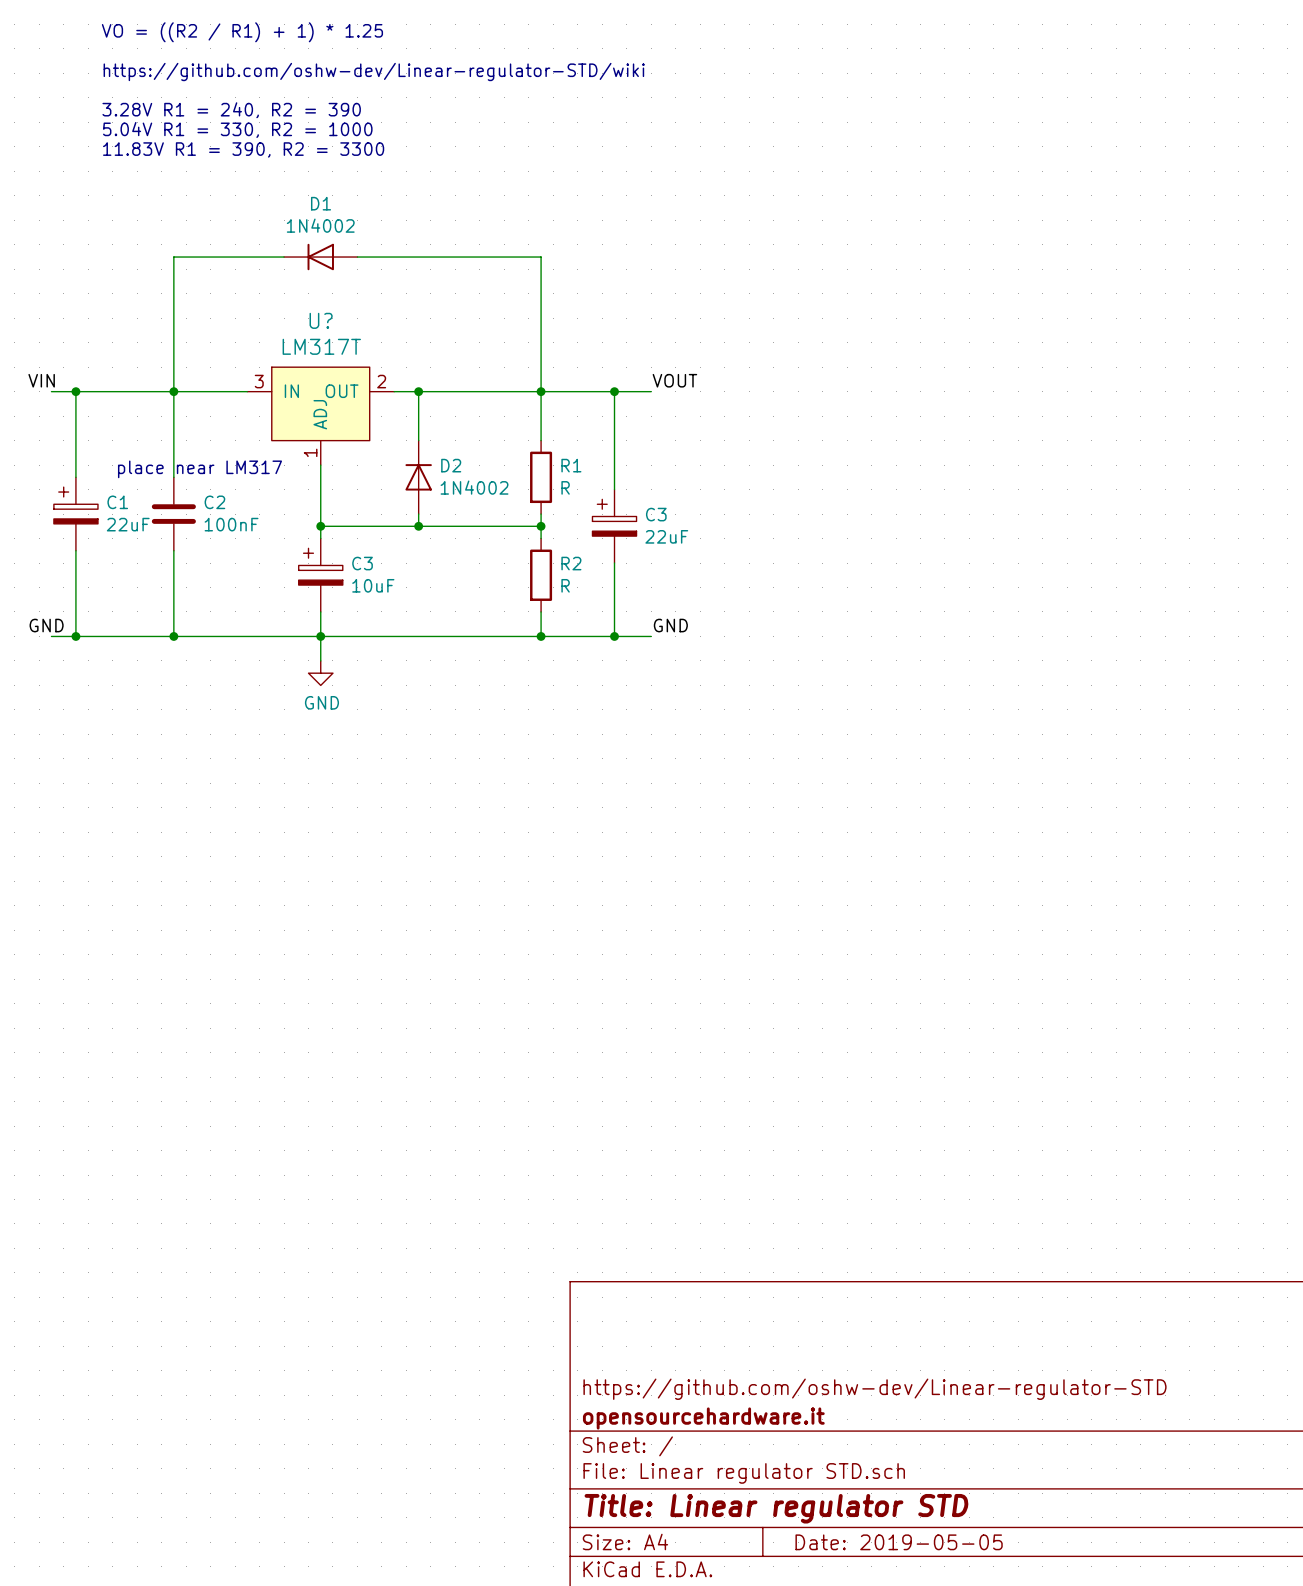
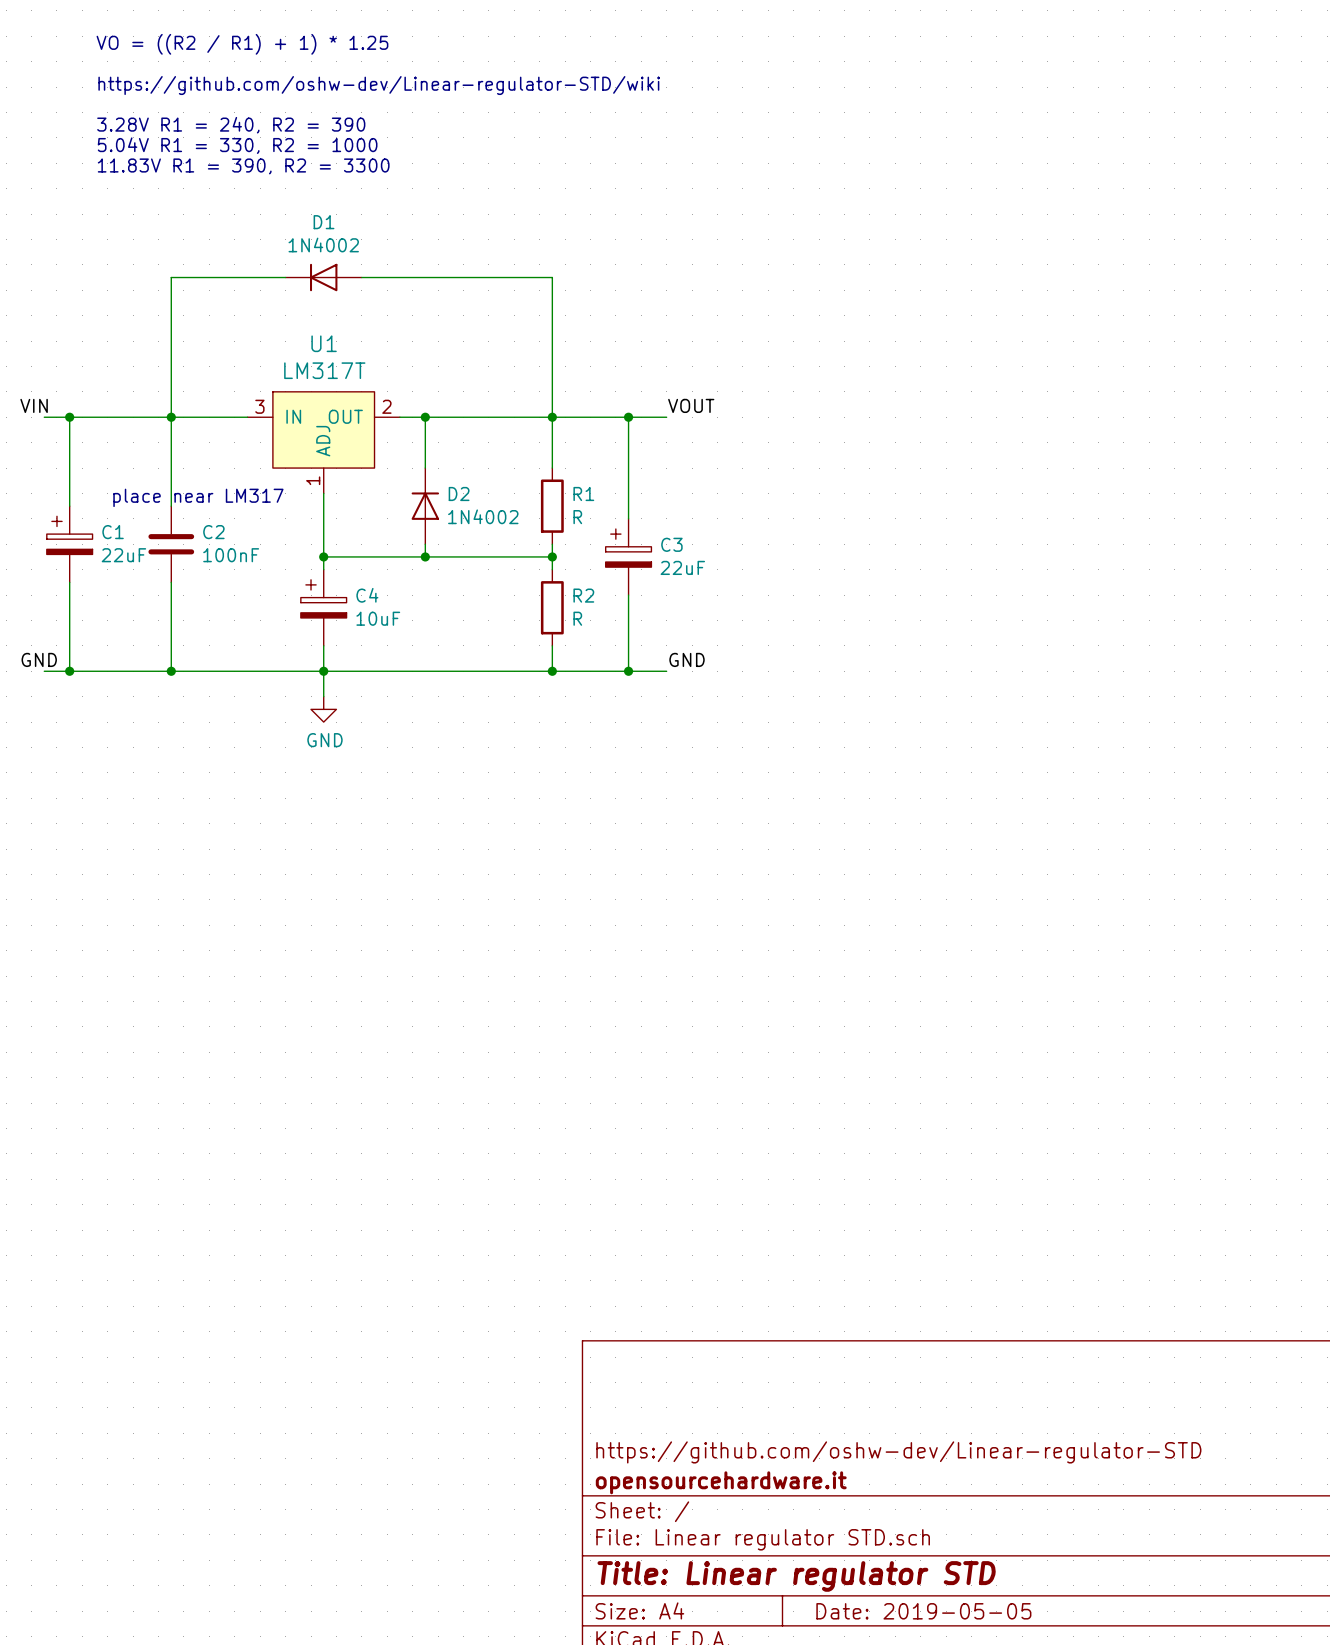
U? name: U? (321, 320) -> U1 (324, 343)
C3 name: C3 (362, 563) -> C4 (367, 595)

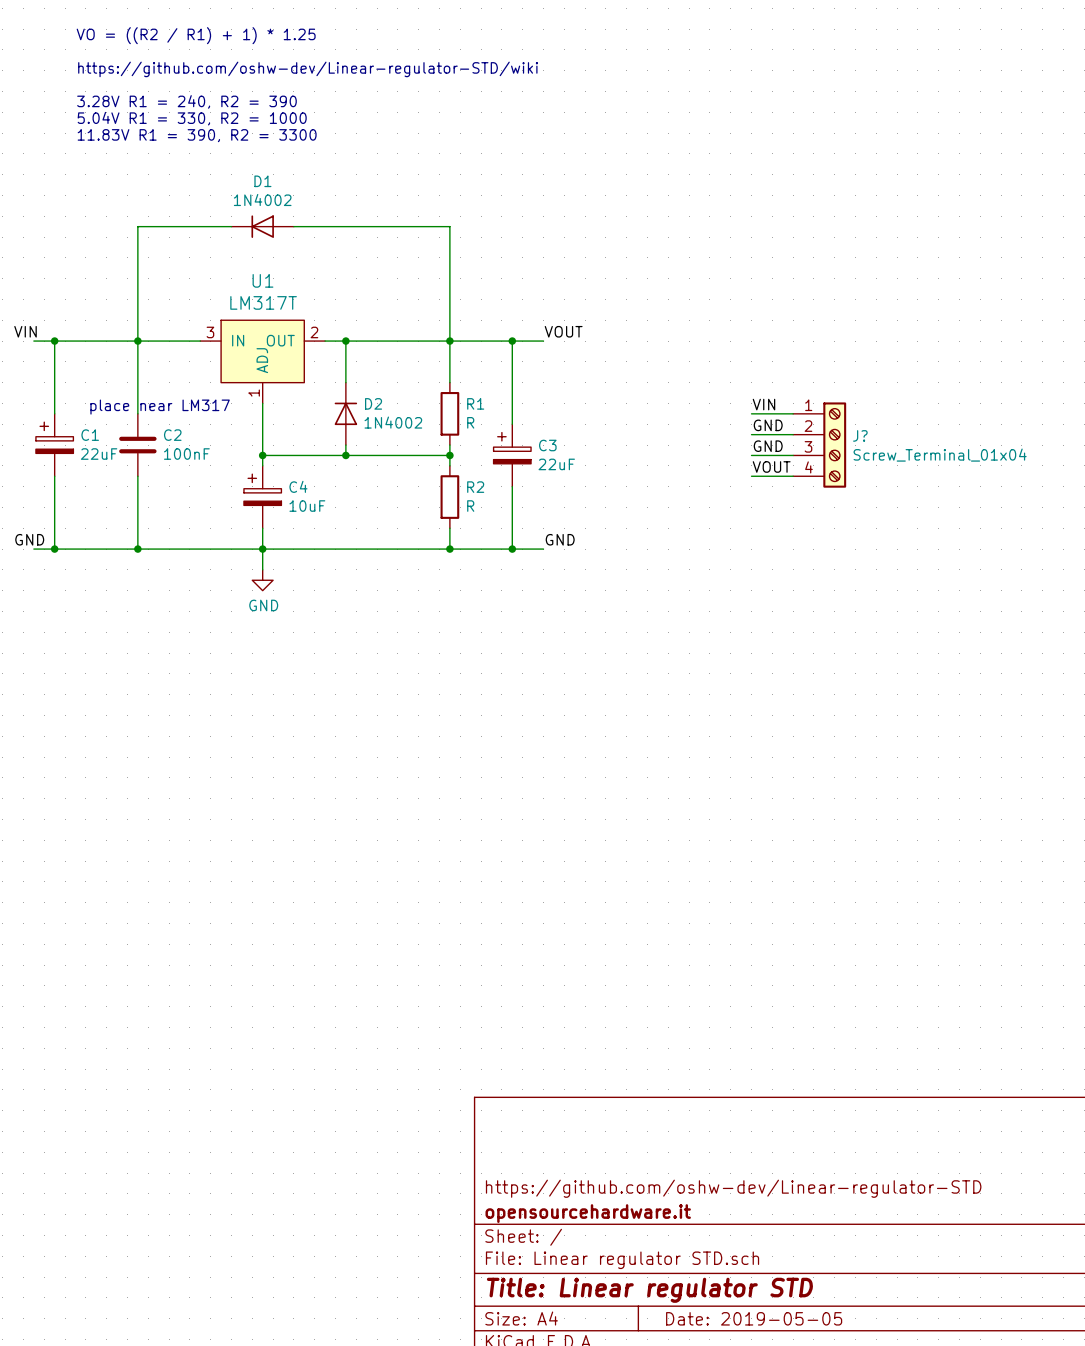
label: none -> VIN (763, 404)
wire: none -> (751, 413) (793, 413)
label: none -> GND (768, 425)
wire: none -> (751, 434) (793, 434)
J?: none -> Screw_Terminal_01x04 (819, 445)
label: none -> GND (768, 446)
wire: none -> (751, 455) (793, 455)
label: none -> VOUT (771, 466)
wire: none -> (751, 476) (793, 476)

